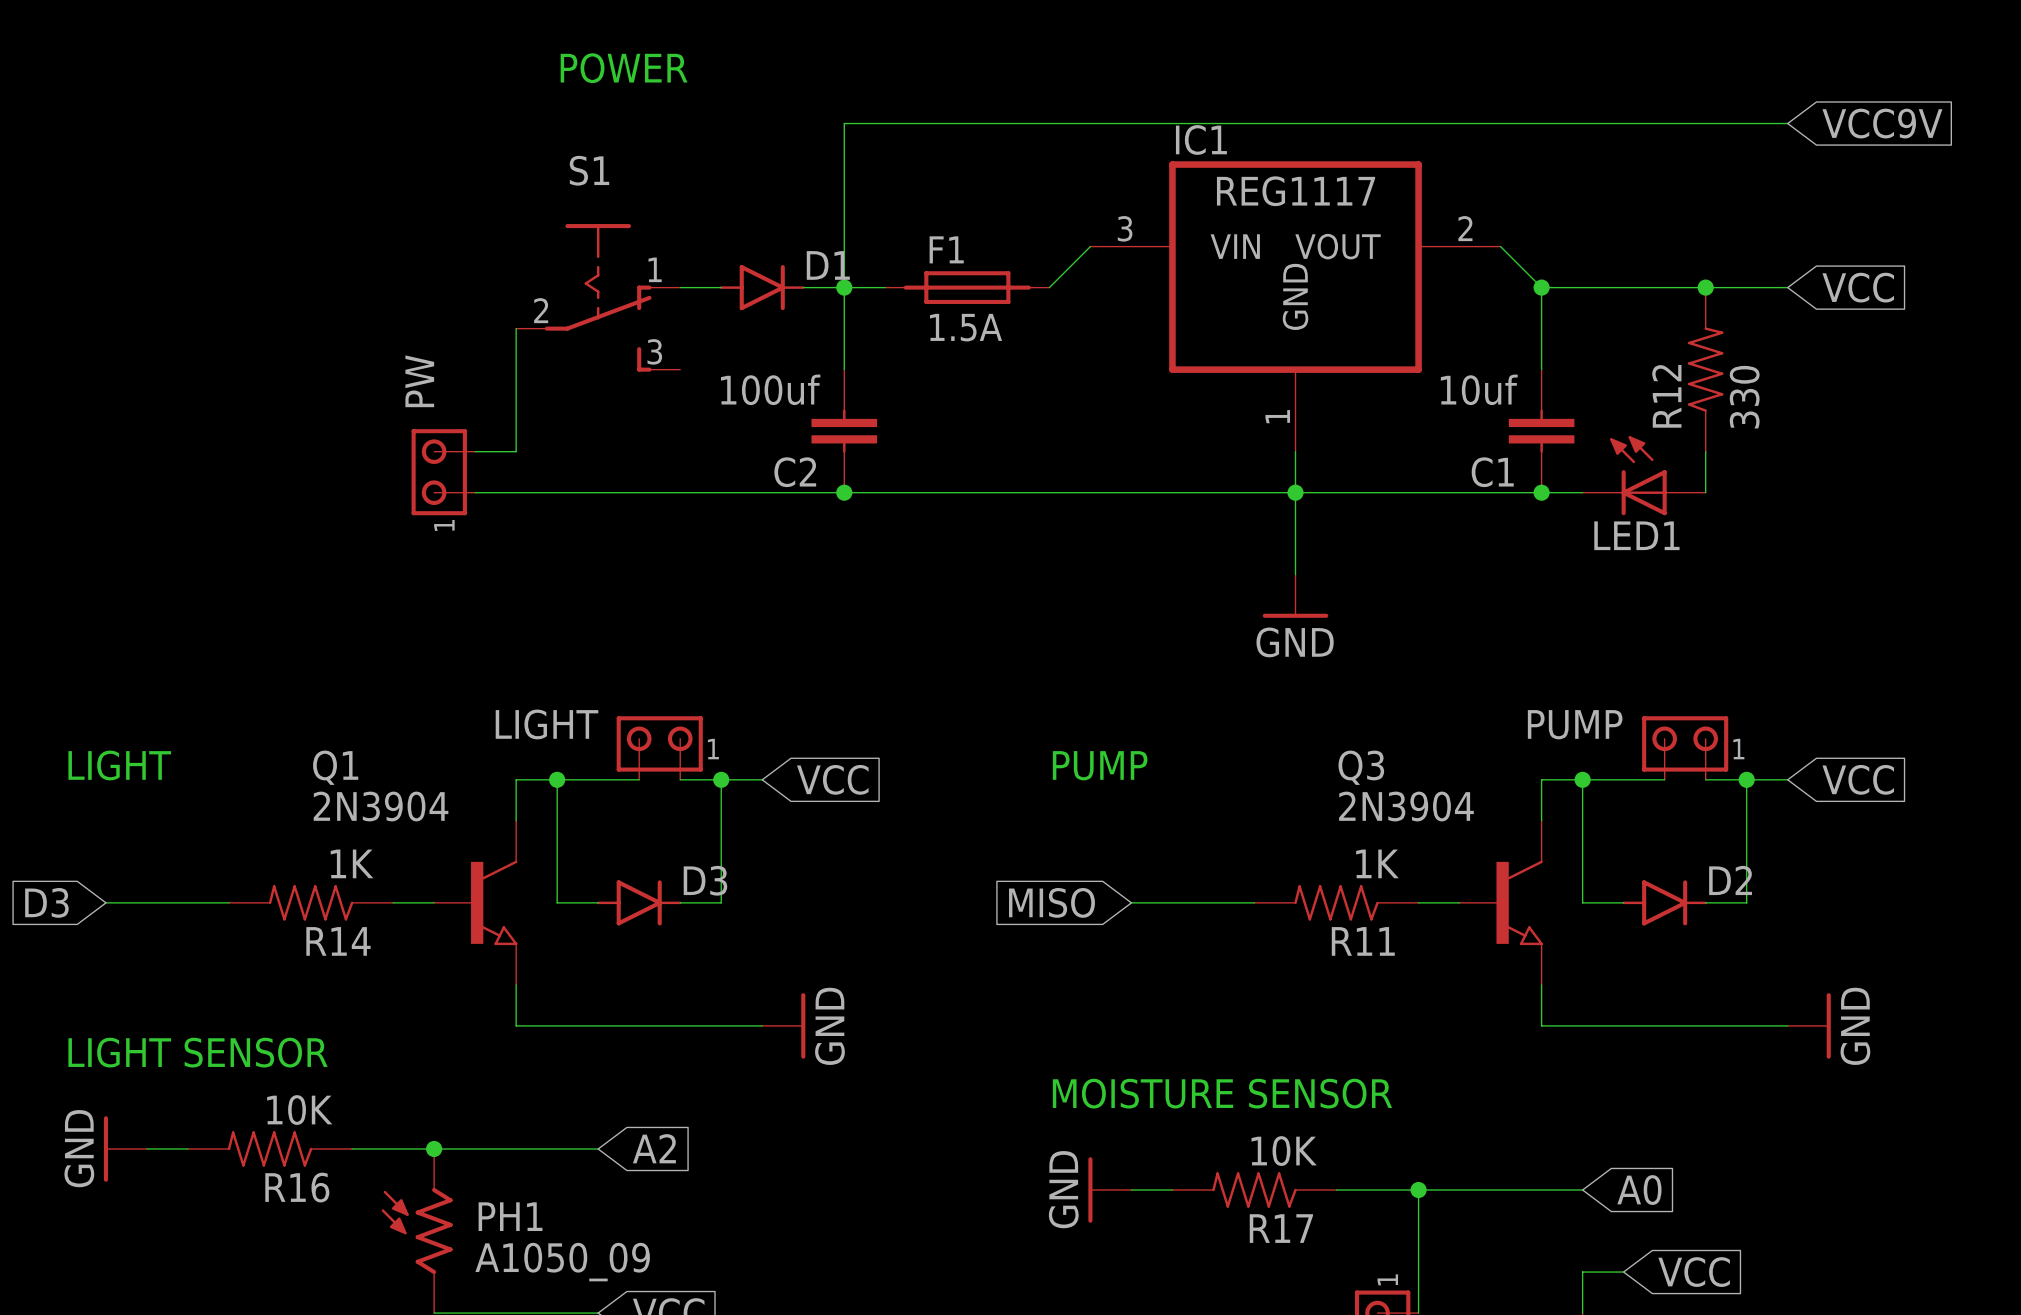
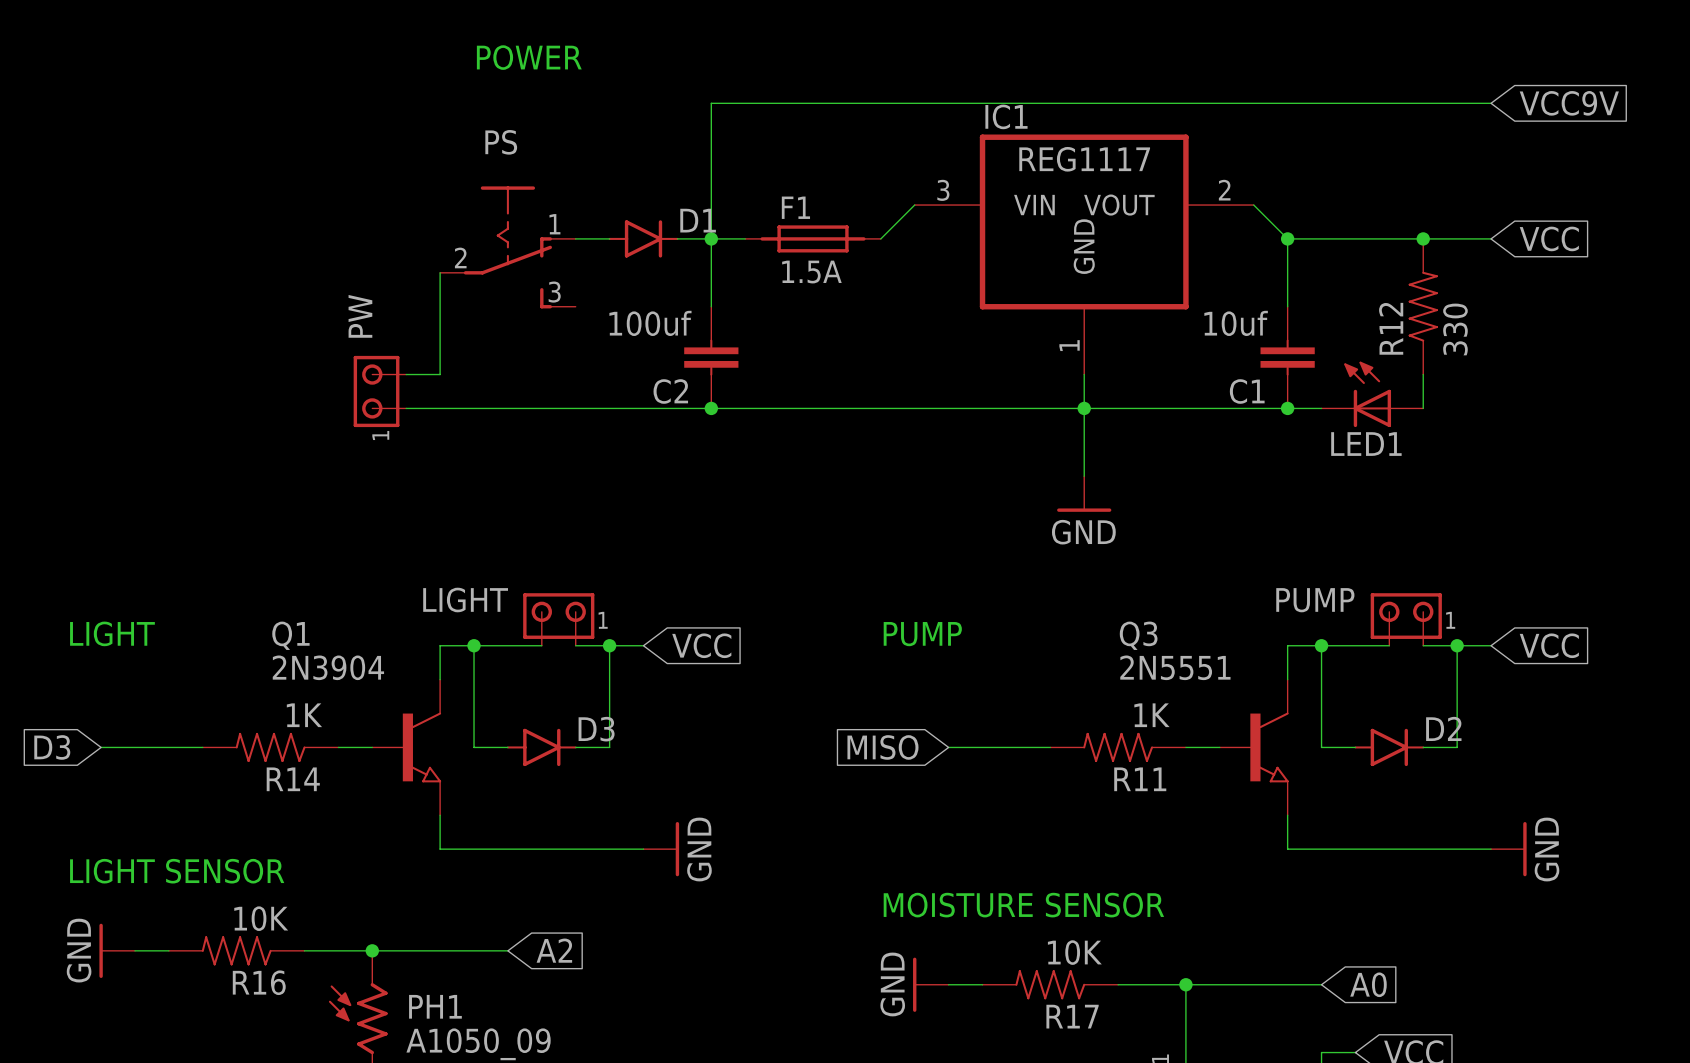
S1 name: S1 (589, 170) -> PS (501, 142)
Q3 value: 2N3904 (1406, 806) -> 2N5551 (1175, 667)

